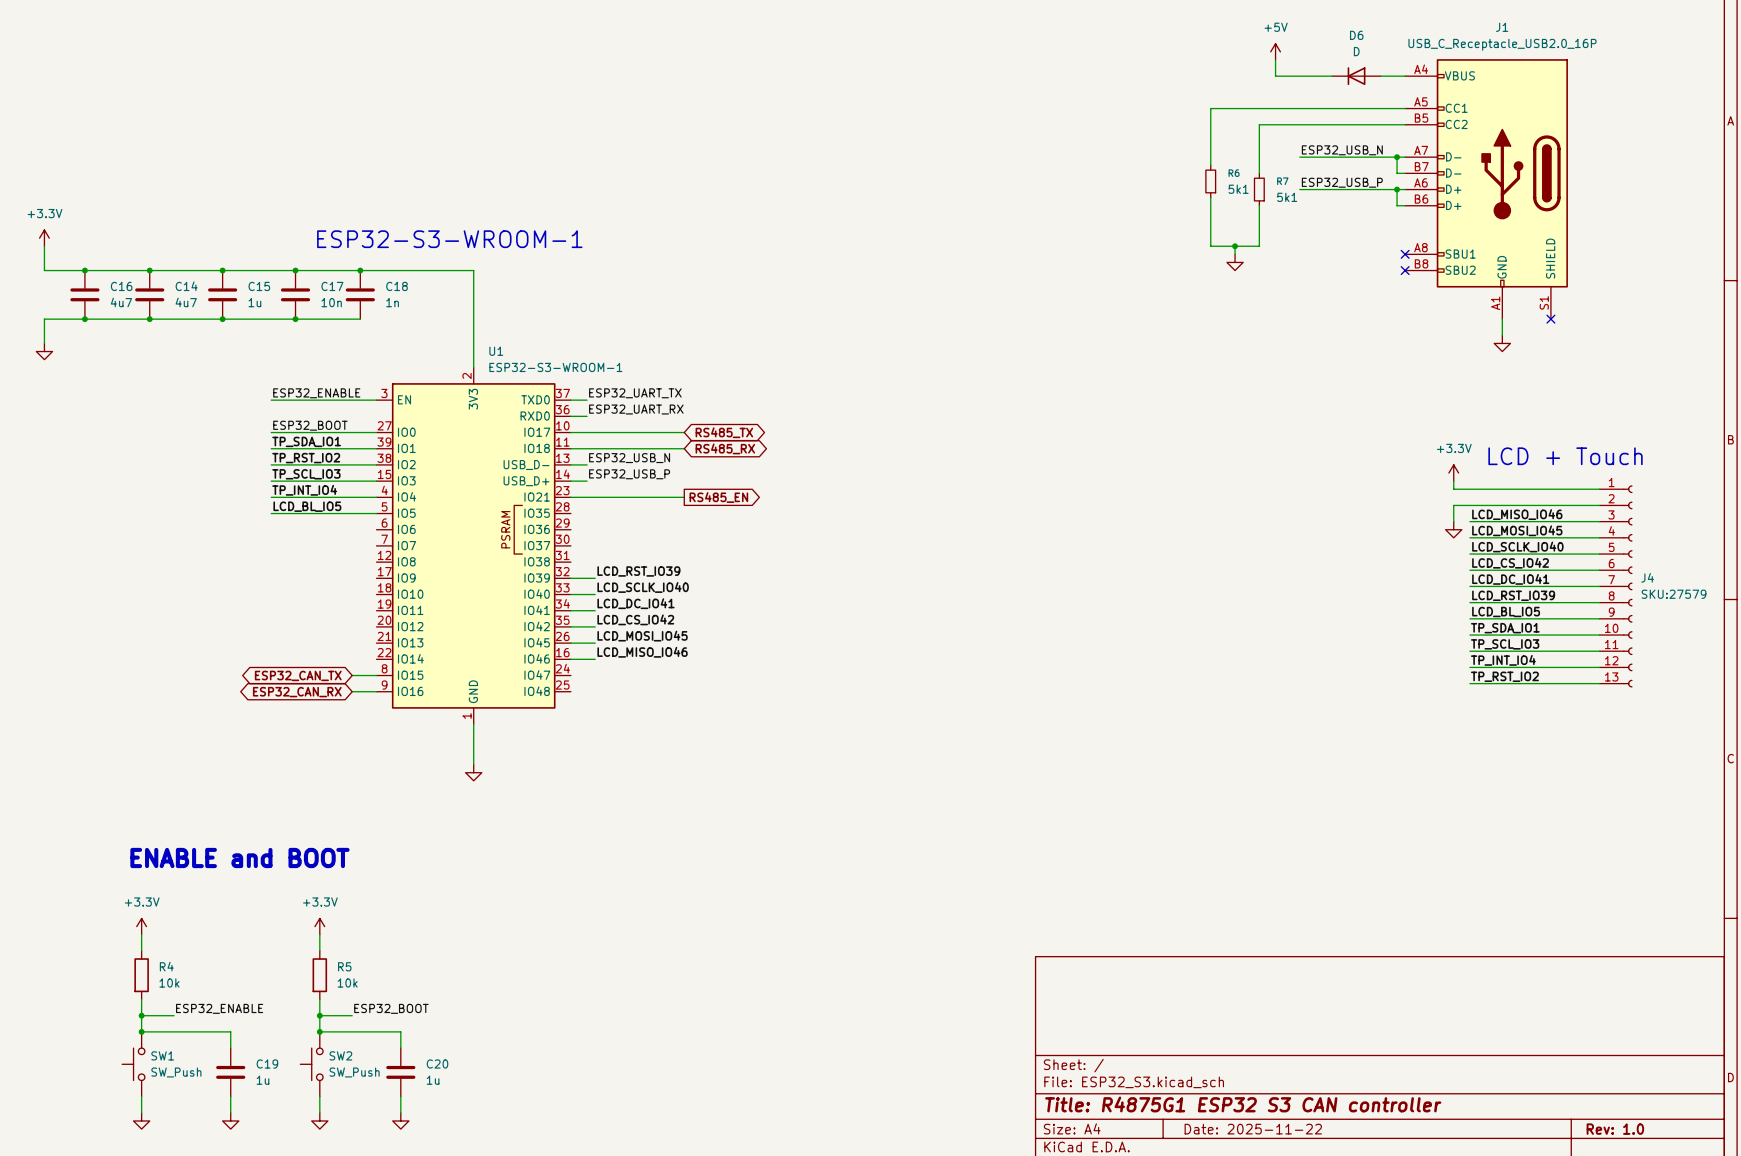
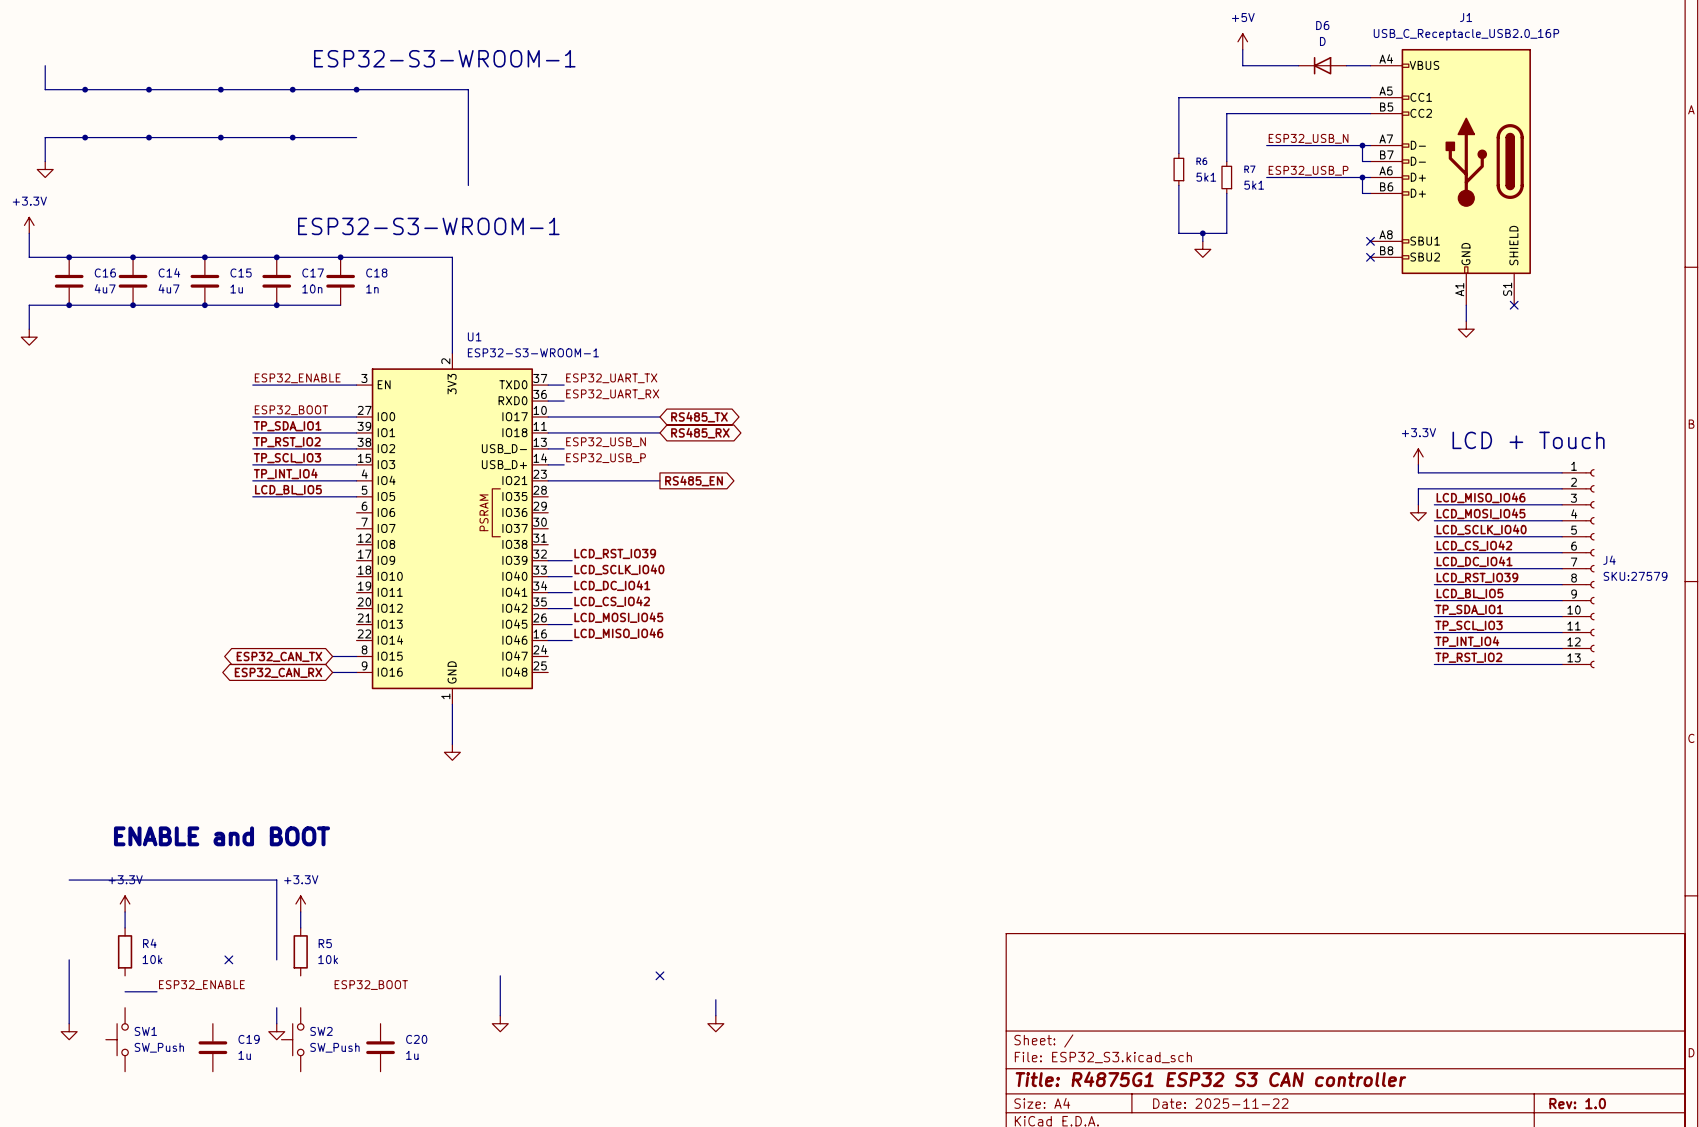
text: none -> ESP32-S3-WROOM-1 (444, 58)
wire: none -> (45, 65) (45, 89) (468, 89) (468, 185)
junction: none -> (85, 89)
junction: none -> (149, 89)
junction: none -> (220, 89)
junction: none -> (292, 89)
junction: none -> (356, 89)
junction: none -> (85, 137)
junction: none -> (149, 137)
junction: none -> (220, 137)
junction: none -> (292, 137)
wire: none -> (356, 137) (45, 137) (45, 161)
power symbol: none -> (45, 169)
wire: none -> (69, 880) (276, 880) (276, 959)
wire: none -> (69, 959) (69, 1023)
no-connect mark: none -> (228, 959)
wire: (141, 999) (141, 1031) (230, 1031) (230, 1048) -> none
wire: (319, 999) (319, 1031) (400, 1031) (400, 1048) -> none
wire: none -> (500, 975) (500, 1015)
no-connect mark: none -> (659, 975)
junction: (141, 1015) -> none
wire: (319, 1015) (352, 1015) -> none
junction: (319, 1015) -> none
wire: none -> (715, 999) (715, 1015)
junction: (141, 1031) -> none
junction: (319, 1031) -> none
power symbol: none -> (500, 1023)
power symbol: none -> (715, 1023)
power symbol: none -> (69, 1031)
power symbol: none -> (276, 1031)
wire: (141, 1096) (141, 1112) -> none
wire: (230, 1096) (230, 1112) -> none
wire: (319, 1096) (319, 1112) -> (276, 1007) (276, 1023)
wire: (400, 1096) (400, 1112) -> none
power symbol: (141, 1120) -> none
power symbol: (230, 1120) -> none
power symbol: (319, 1120) -> none
power symbol: (400, 1120) -> none

